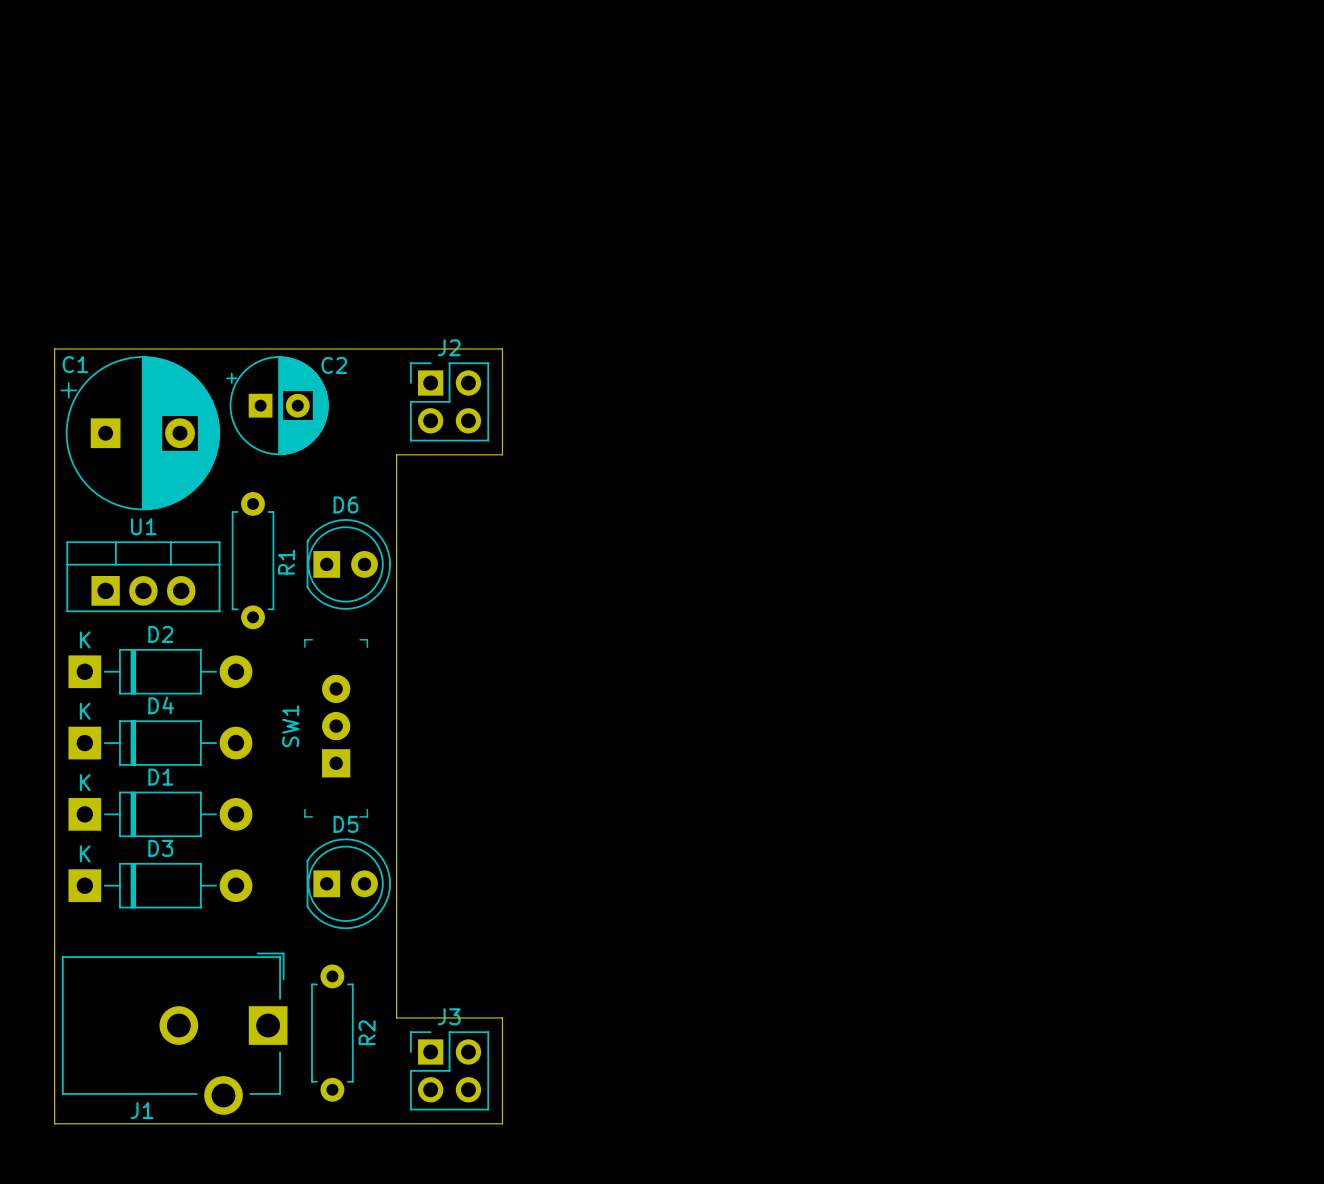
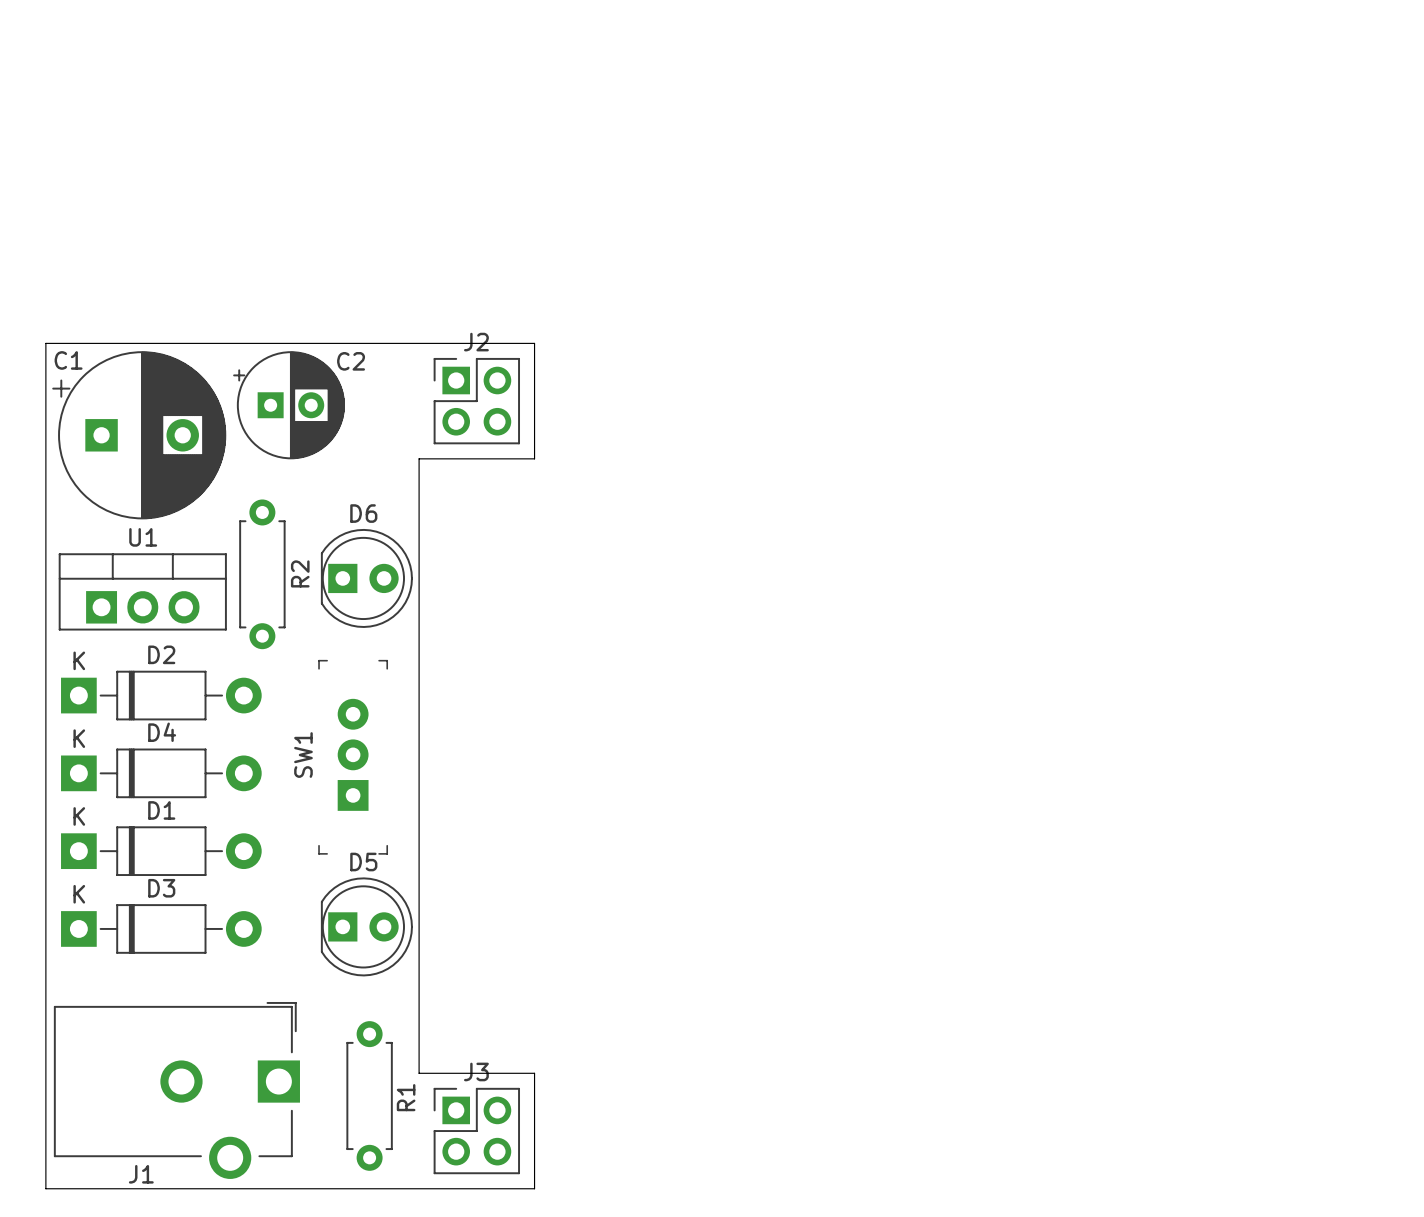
R1 name: R1 (286, 562) -> R2 (300, 573)
R2: (332, 1033) -> none
R1: none -> (369, 1095)

